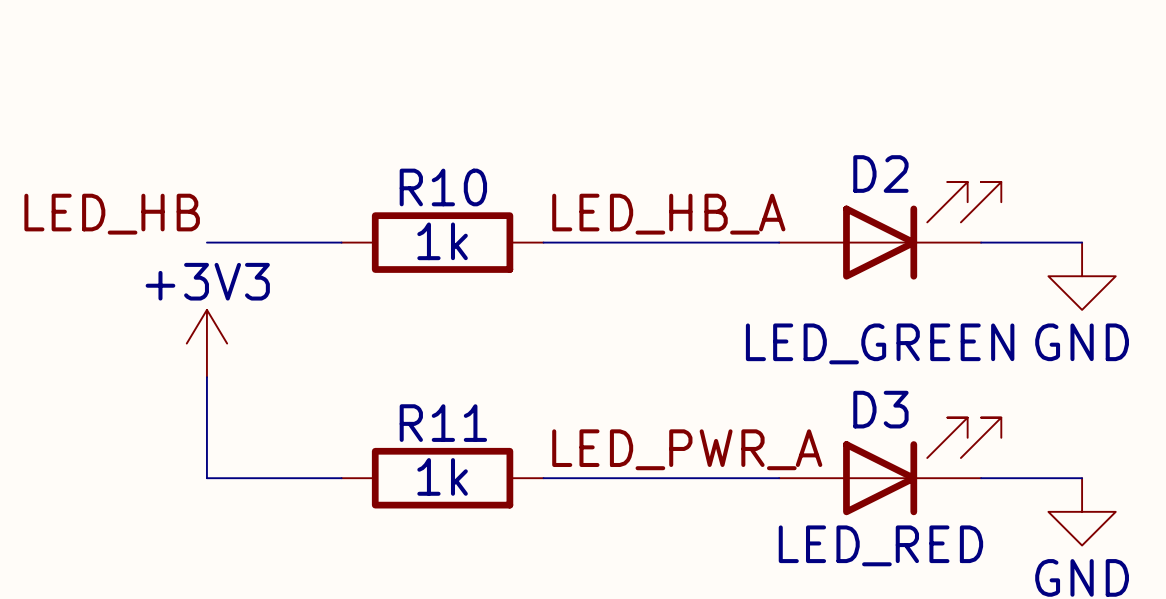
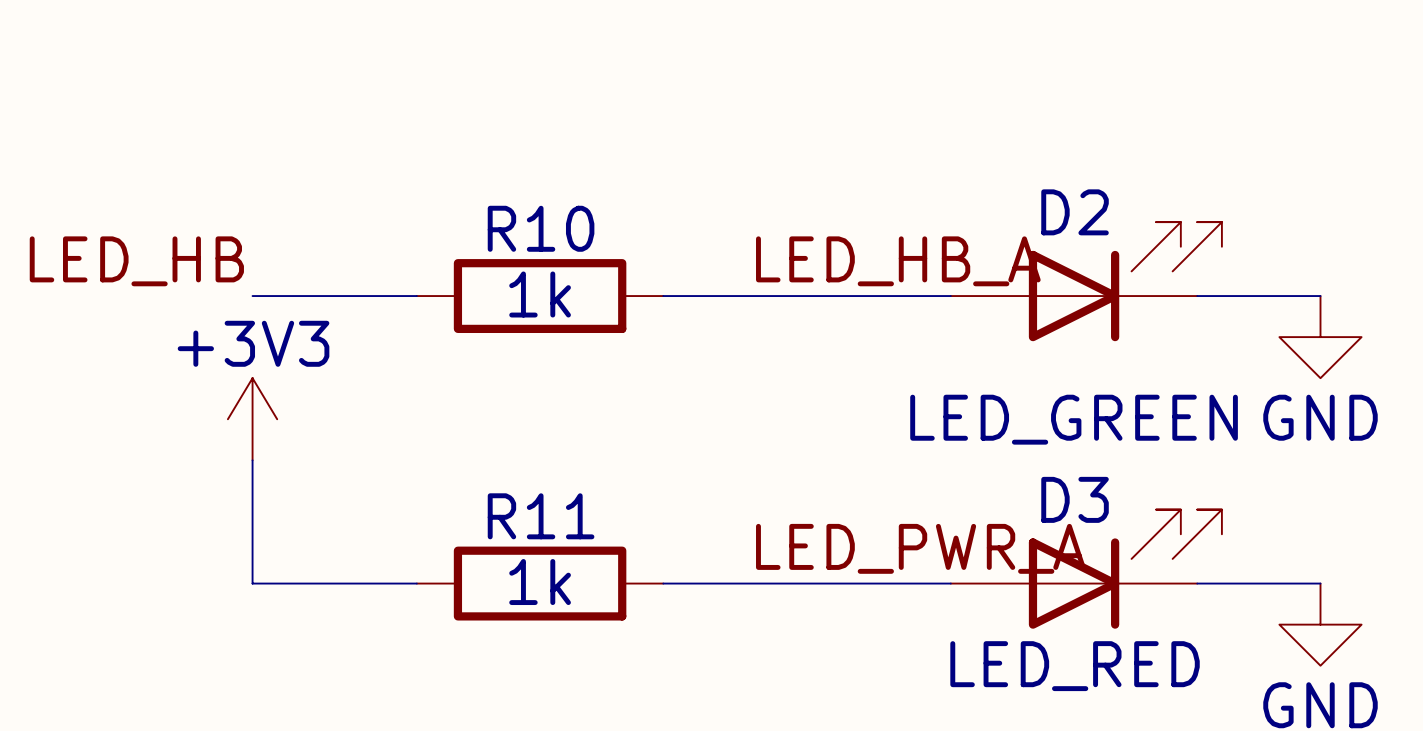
label position: LED_HB_A (668, 214) -> LED_HB_A (898, 261)
label position: LED_PWR_A (687, 449) -> LED_PWR_A (920, 548)

